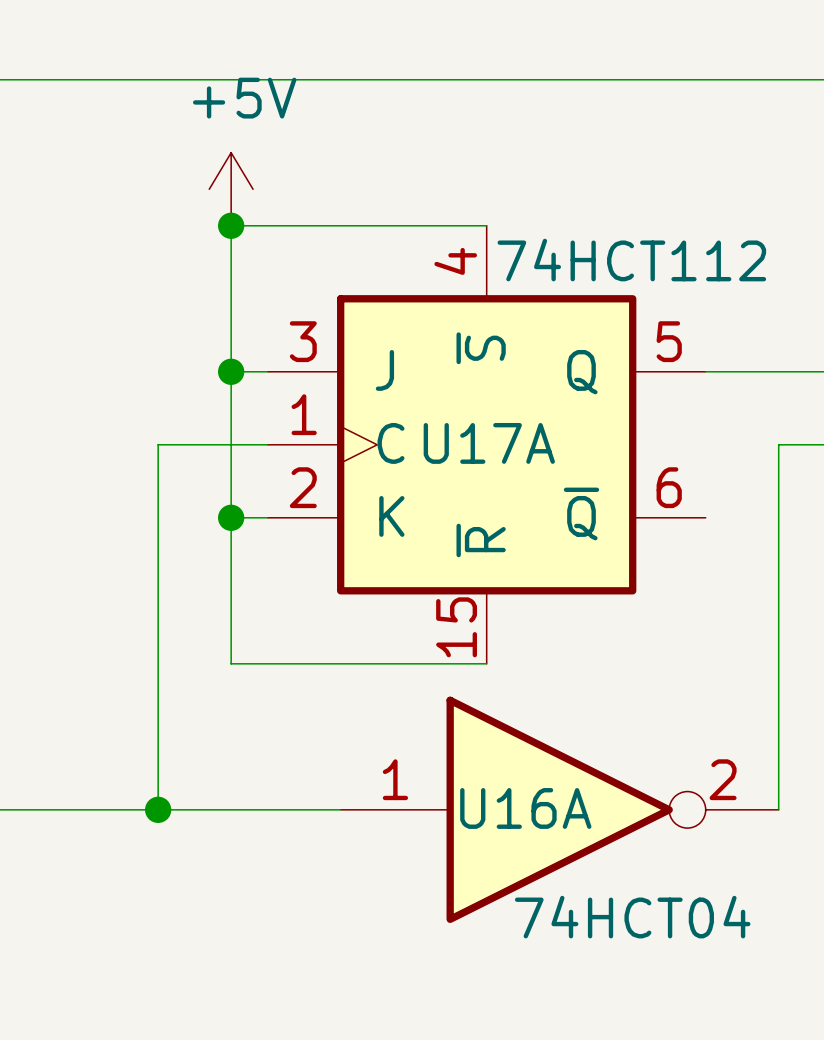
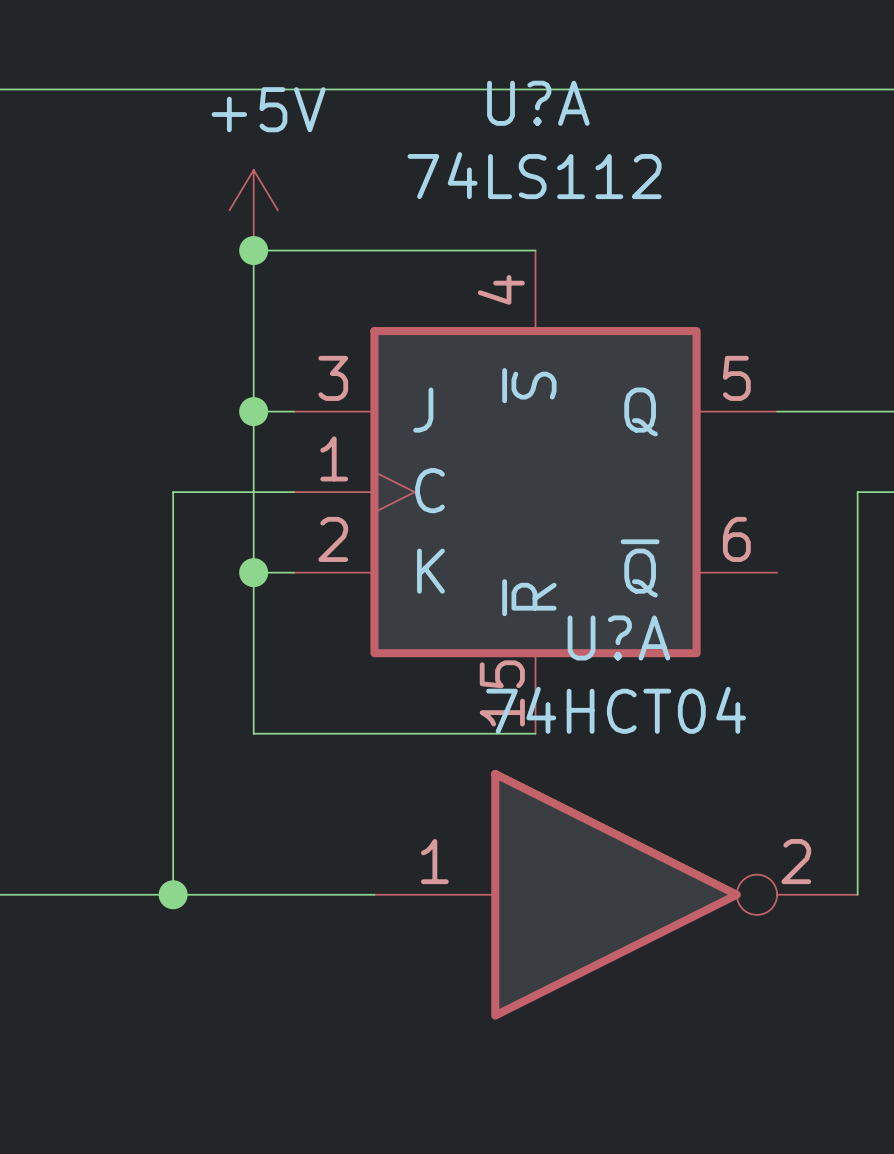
U17A value: 74HCT112 (631, 260) -> 74LS112 (534, 175)
U17A name: U17A (489, 443) -> U?A (538, 103)
U16A name: U16A (525, 808) -> U?A (618, 637)
U16A value position: 74HCT04 (632, 917) -> 74HCT04 (616, 710)

